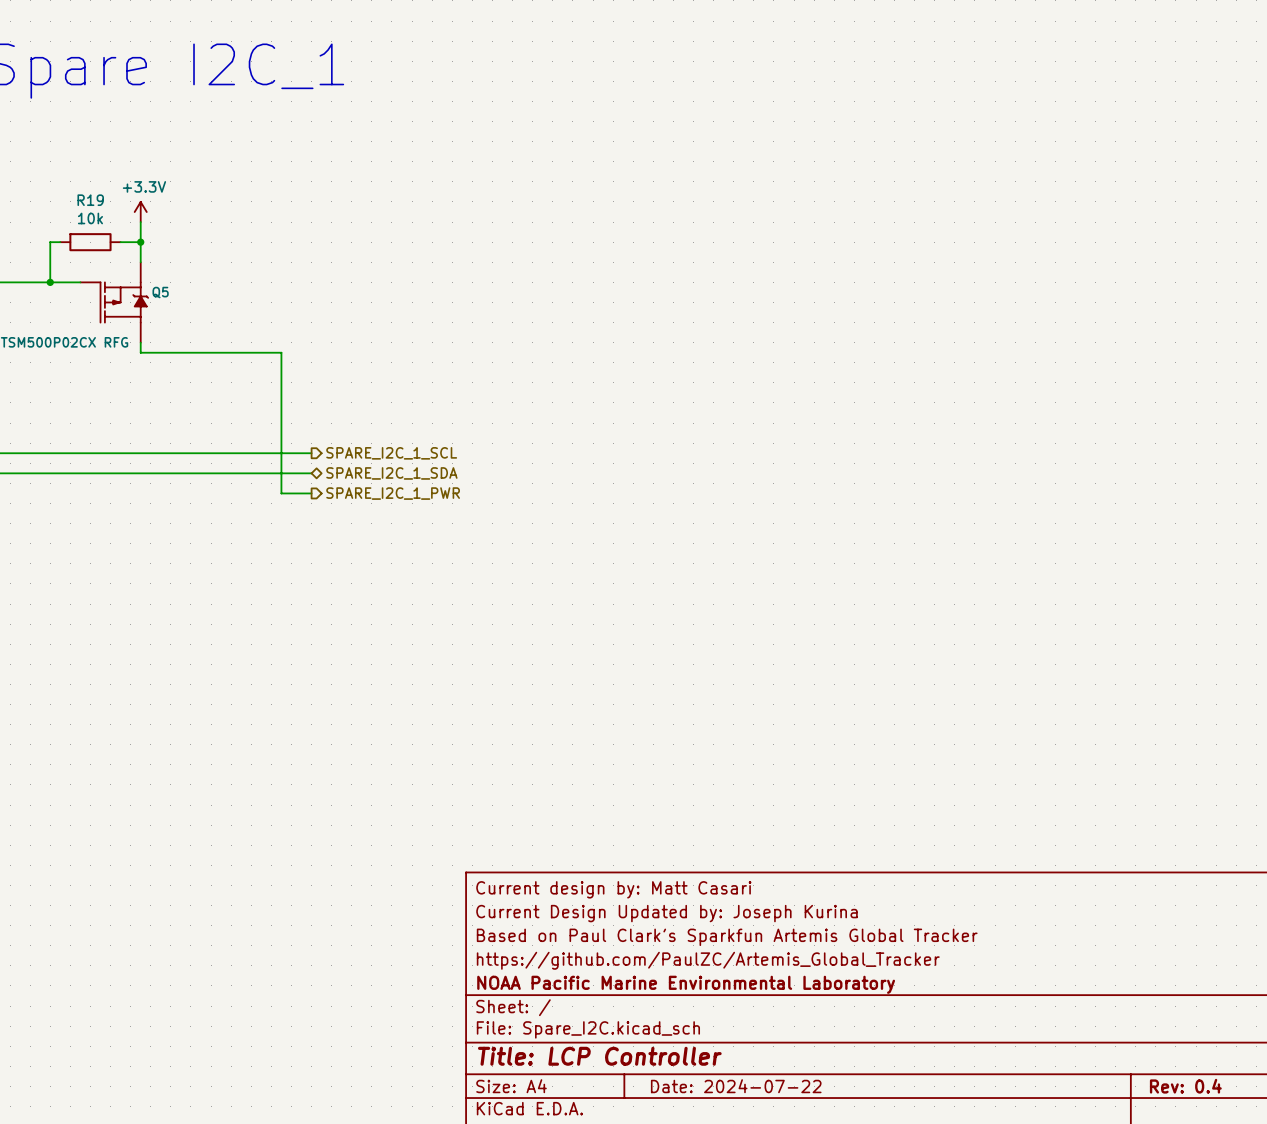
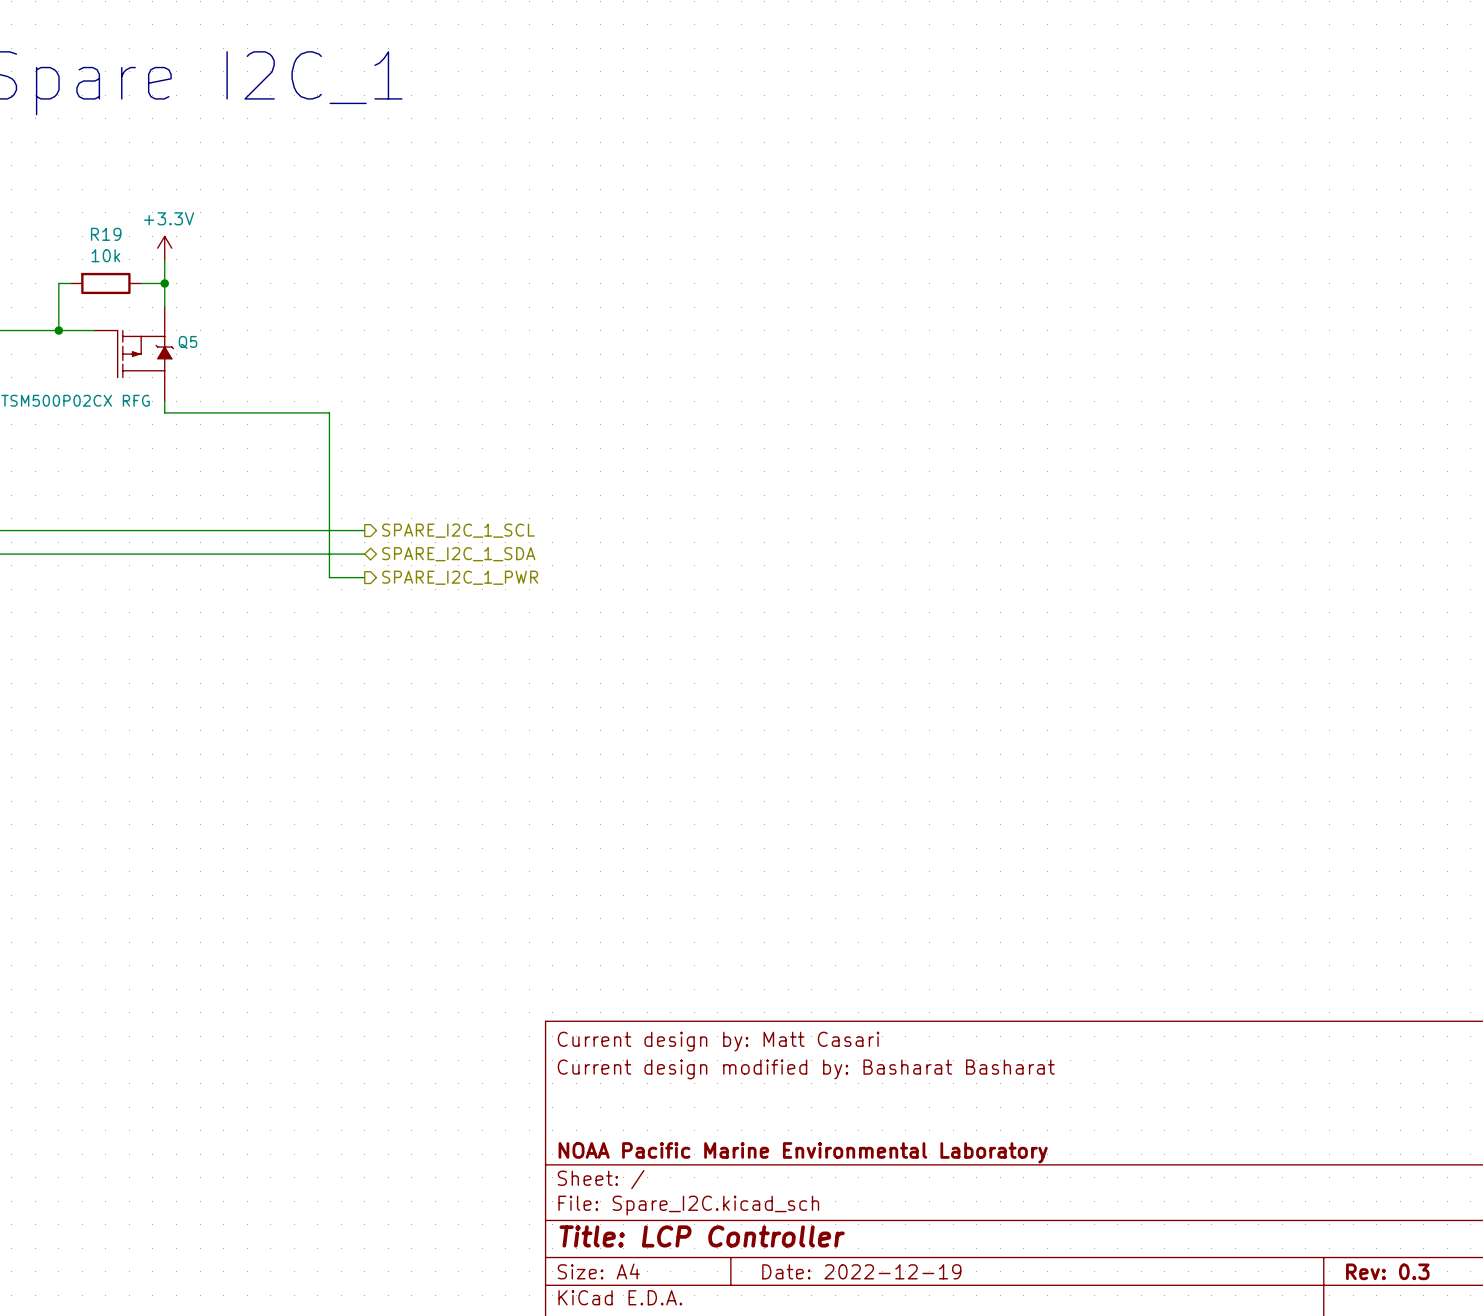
title block: Current Design Updated by: Joseph Kurina (666, 913) -> Current design modified by: Basharat Basharat (806, 1069)
title block: Based on Paul Clark's Sparkfun Artemis Global Tracker (727, 937) -> none
title block: https://github.com/PaulZC/Artemis_Global_Tracker (708, 960) -> none
title block: Date: 2024-07-22 (736, 1086) -> Date: 2022-12-19 (861, 1271)
title block: Rev: 0.4 (1185, 1086) -> Rev: 0.3 (1387, 1271)

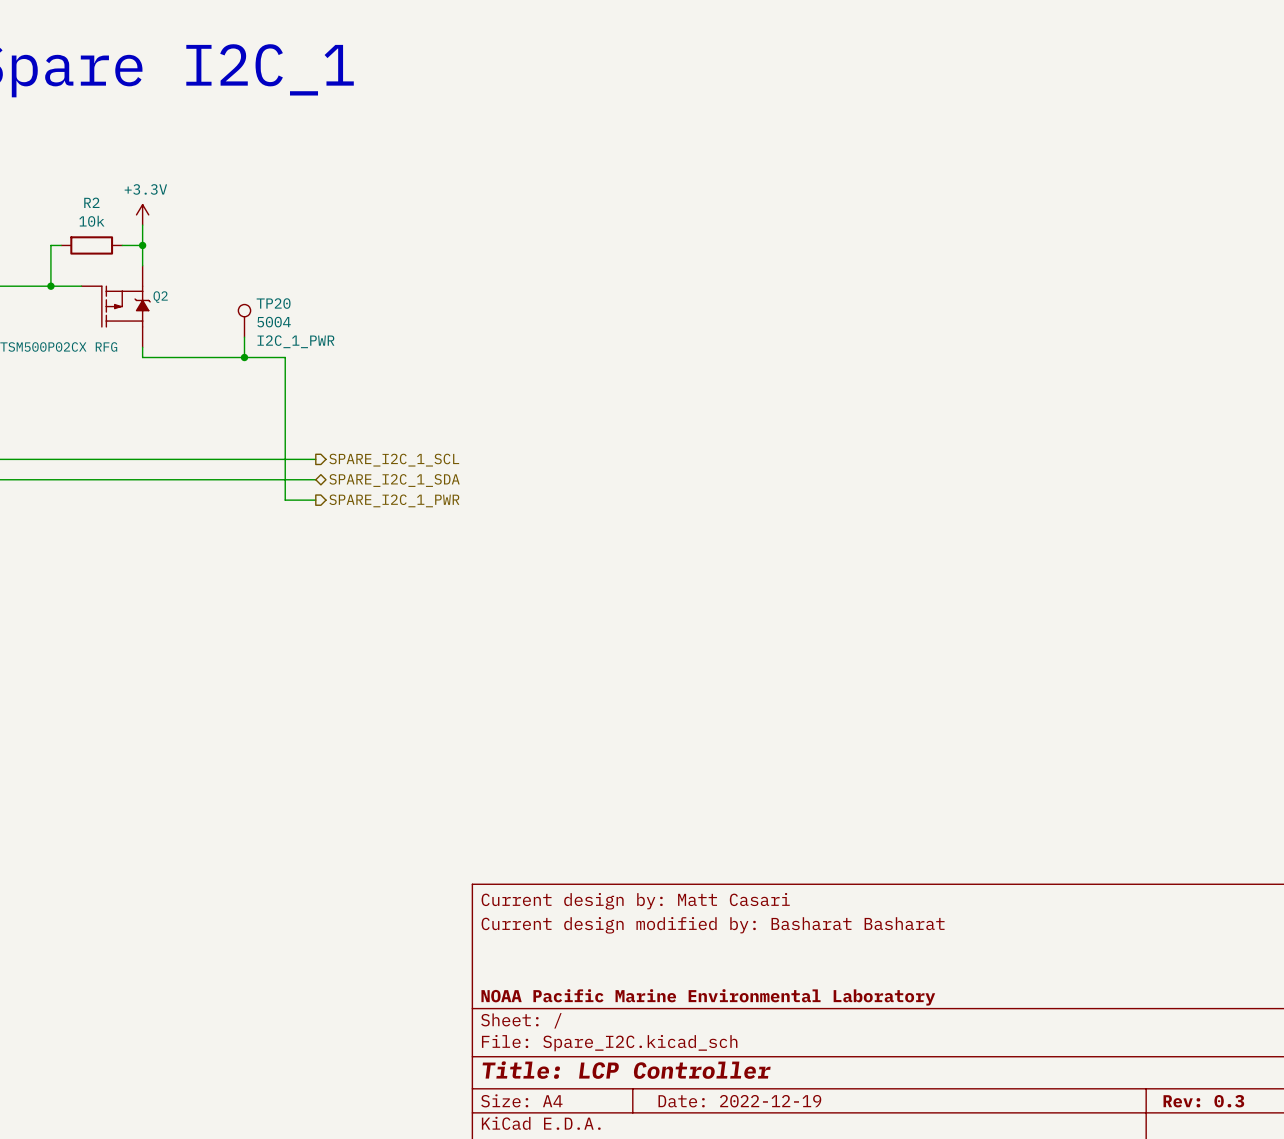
R19 name: R19 (106, 234) -> R2 (91, 202)
Q5 name: Q5 (188, 342) -> Q2 (160, 297)
TP20: none -> 5004 (244, 320)
wire: none -> (244, 337) (244, 357)
junction: none -> (244, 357)

